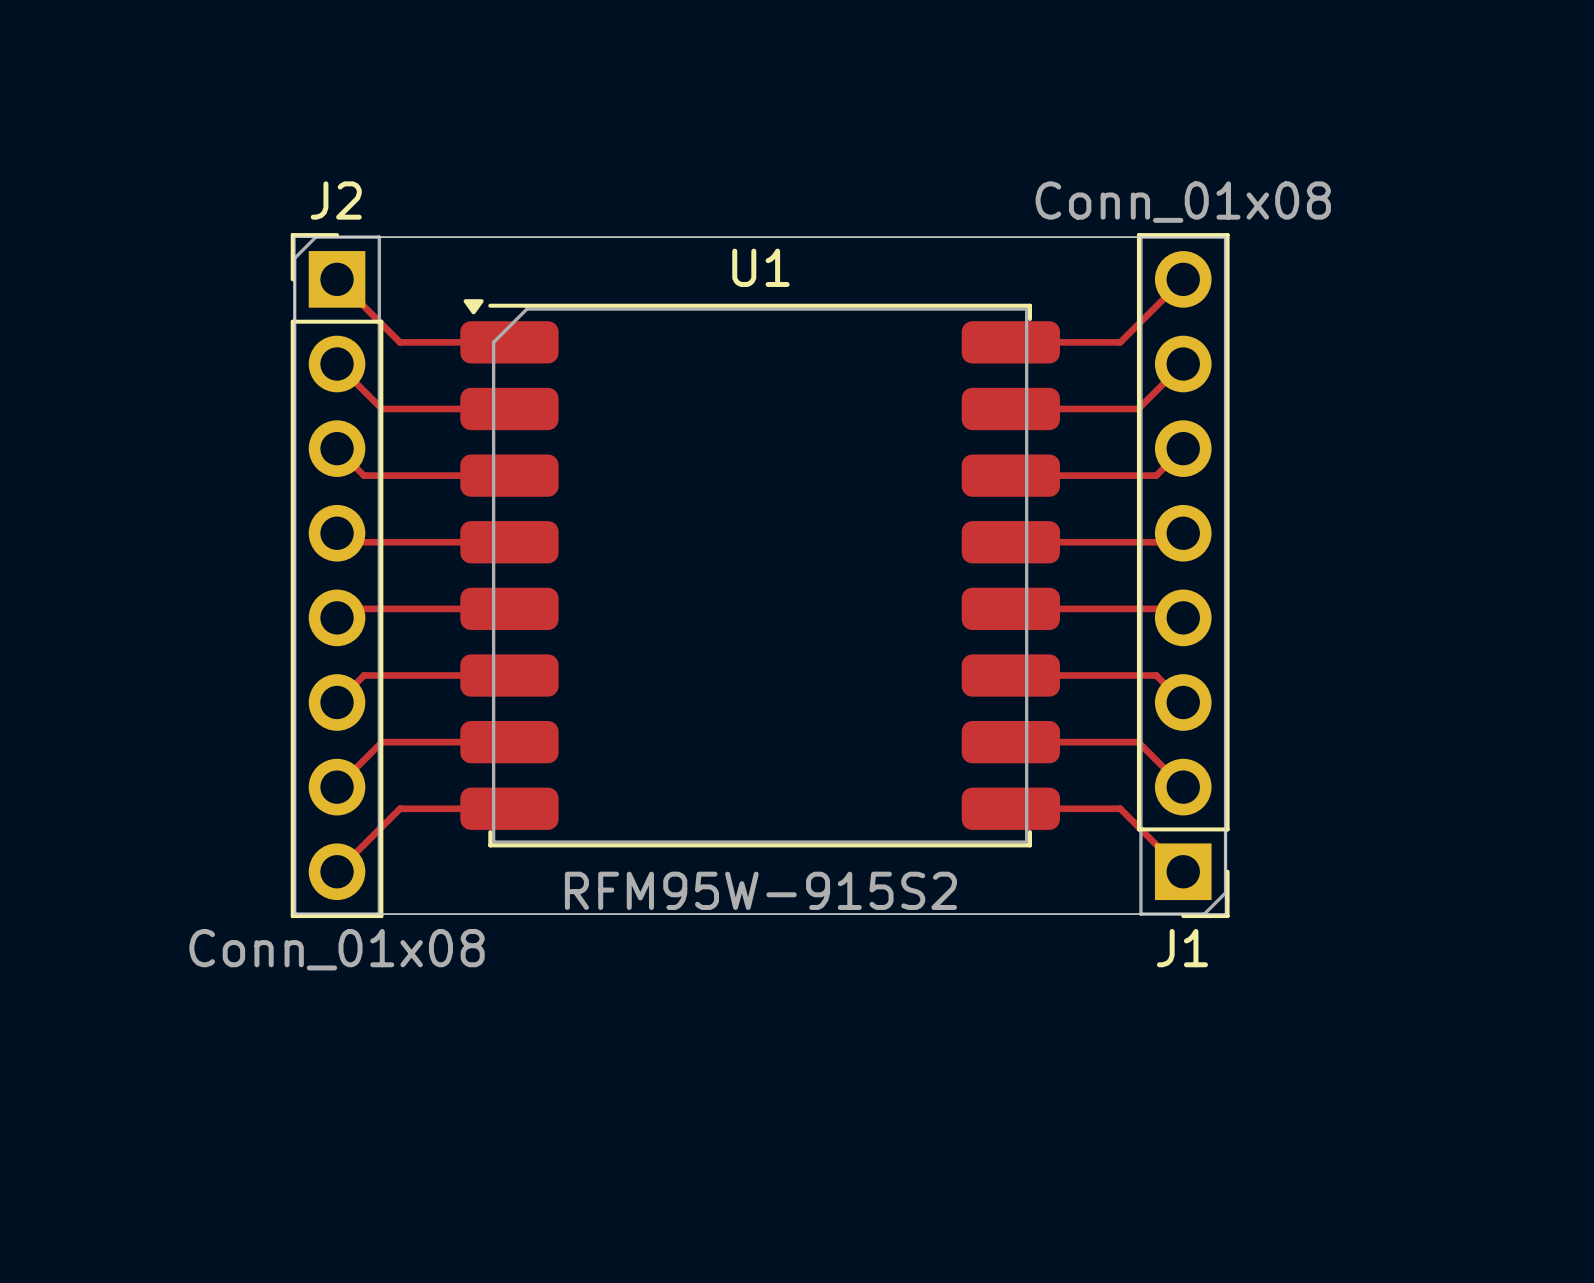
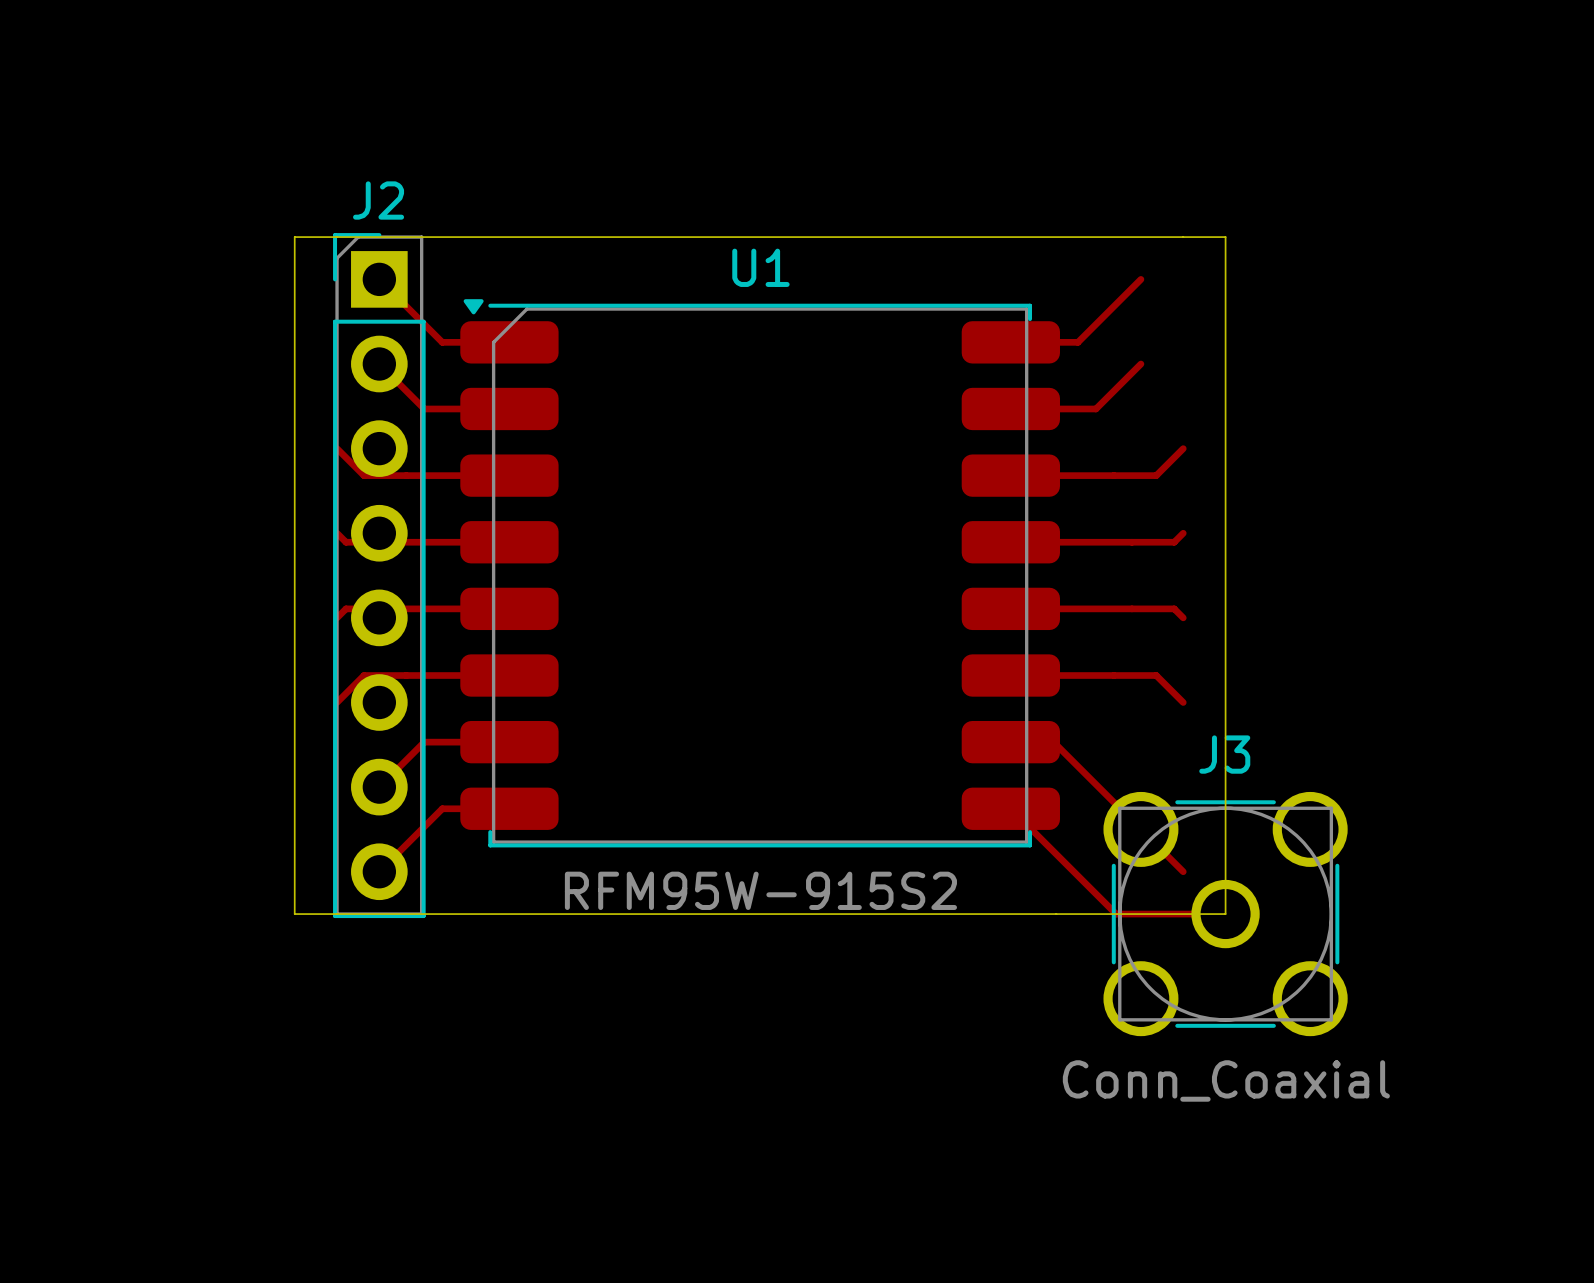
track: (337, 279) (400, 342) (442, 342) -> (379, 279) (442, 342)
track: (1183, 279) (1120, 342) (1077, 342) -> (1140, 279) (1077, 342)
track: (337, 364) (382, 408) (424, 408) -> (379, 364) (424, 408)
track: (1183, 364) (1138, 408) (1095, 408) -> (1140, 364) (1095, 408)
J2 position: (337, 575) -> (379, 575)
J1: Conn_01x08 (1183, 575) -> none
track: (424, 742) (382, 742) (337, 787) -> (424, 742) (379, 787)
track: (1053, 742) (1138, 742) (1183, 787) -> (1053, 742) (1120, 808)
track: (442, 808) (400, 808) (337, 871) -> (442, 808) (379, 871)
track: (1010, 808) (1120, 808) -> (1010, 808) (1116, 914) (1225, 914)
J3: none -> Conn_Coaxial (1225, 914)
J2 value: Conn_01x08 (337, 949) -> none

